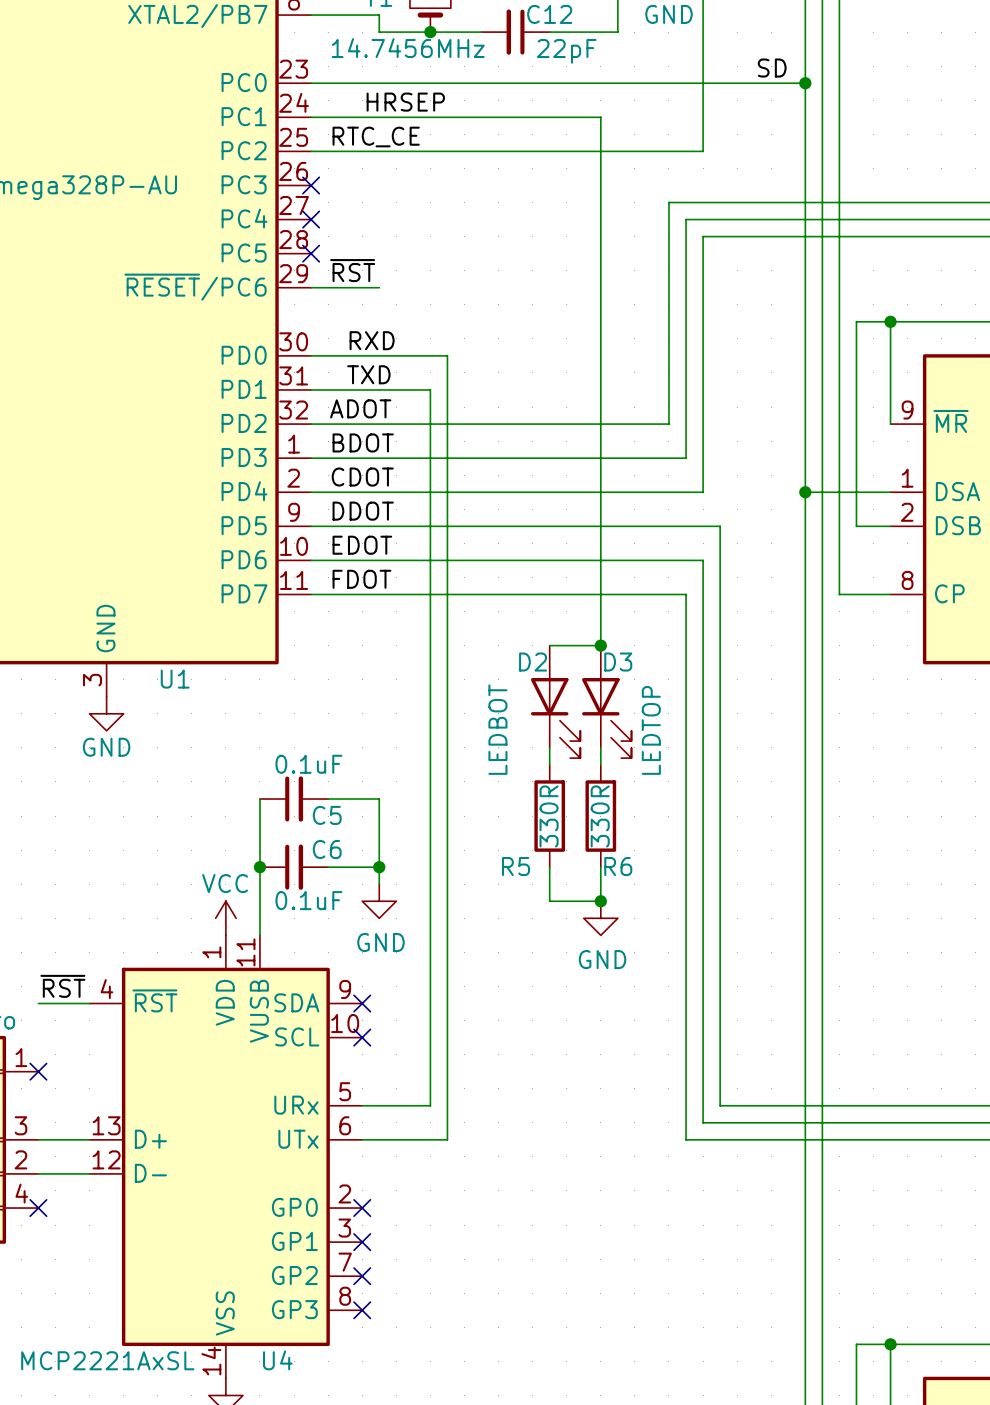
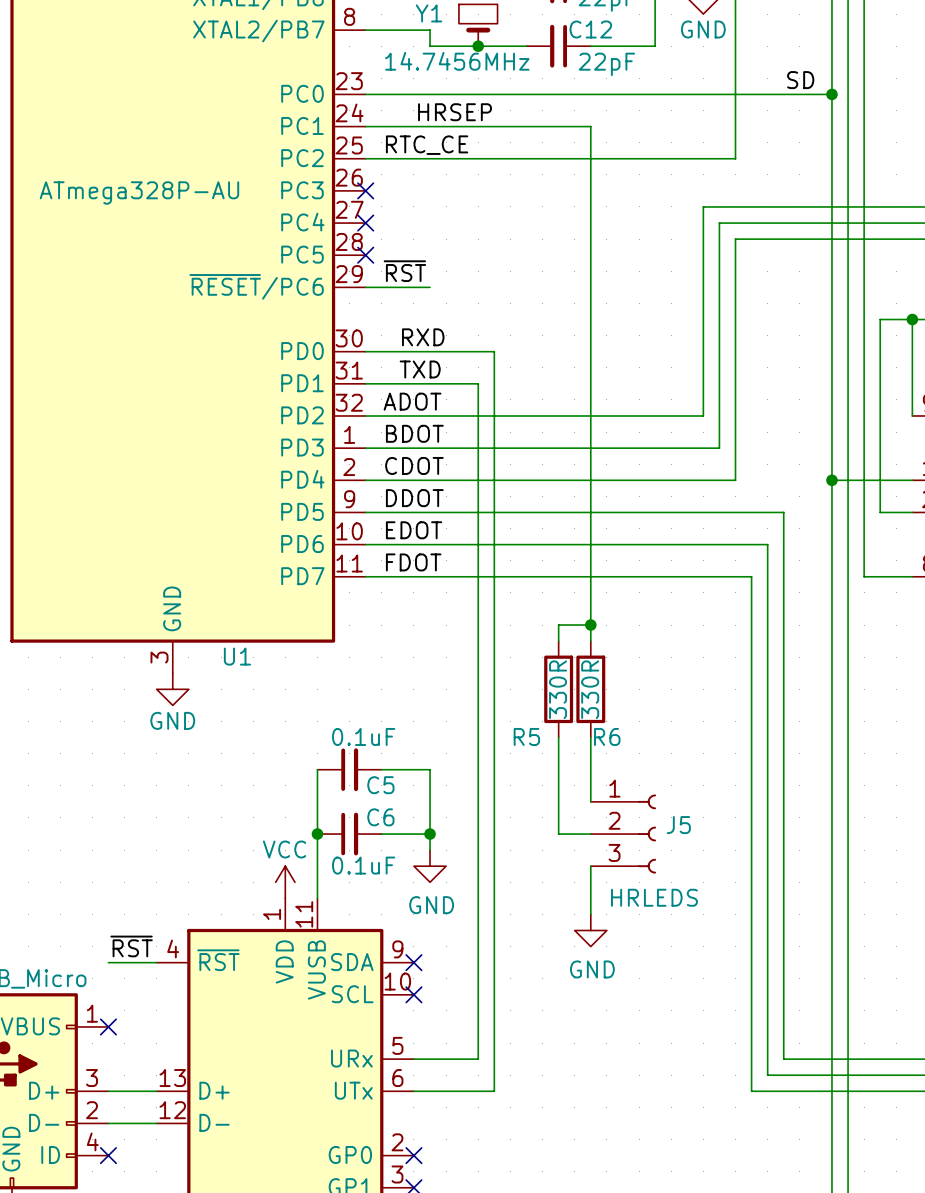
wire: (549, 117) (600, 117) (600, 645) (549, 645) -> (590, 126) (590, 641)
wire: (720, 526) (720, 594) -> (719, 576) (751, 576)
wire: none -> (751, 512) (783, 512) (783, 1059)
wire: (703, 560) (703, 1122) (737, 1122) -> (735, 544) (767, 544) (767, 1075)
wire: (686, 594) (686, 1139) (720, 1139) -> none
wire: none -> (590, 625) (558, 625) (558, 641)
junction position: (600, 645) -> (590, 625)
D2: LEDBOT (555, 701) -> none
D3: LEDTOP (606, 701) -> none
wire: (600, 747) (600, 764) -> none
R5 position: (549, 816) -> (558, 689)
R6 position: (600, 816) -> (590, 689)
wire: (549, 867) (549, 901) (600, 901) (600, 867) -> (590, 834) (558, 834) (558, 737)
J5: none -> HRLEDS (623, 834)
wire: none -> (590, 866) (590, 914)
junction: (600, 901) -> none
power symbol position: GND (600, 918) -> GND (590, 930)
wire: (720, 1105) (754, 1105) -> (751, 1059) (751, 1091)

